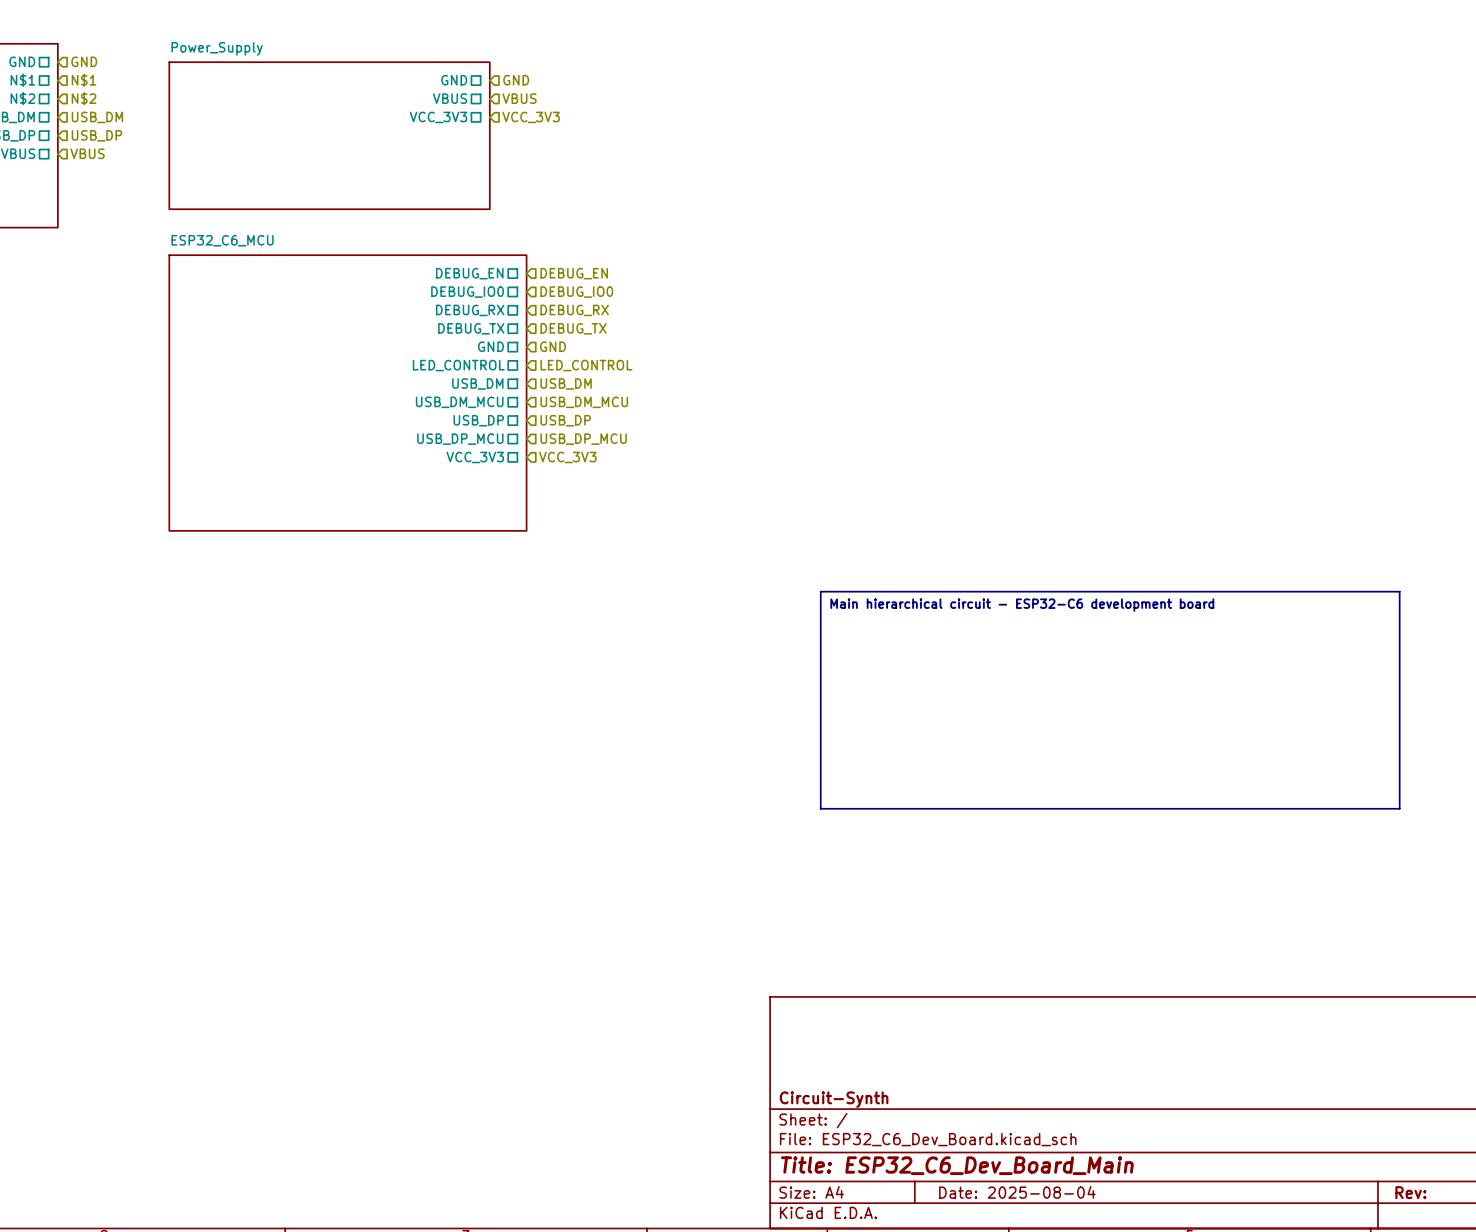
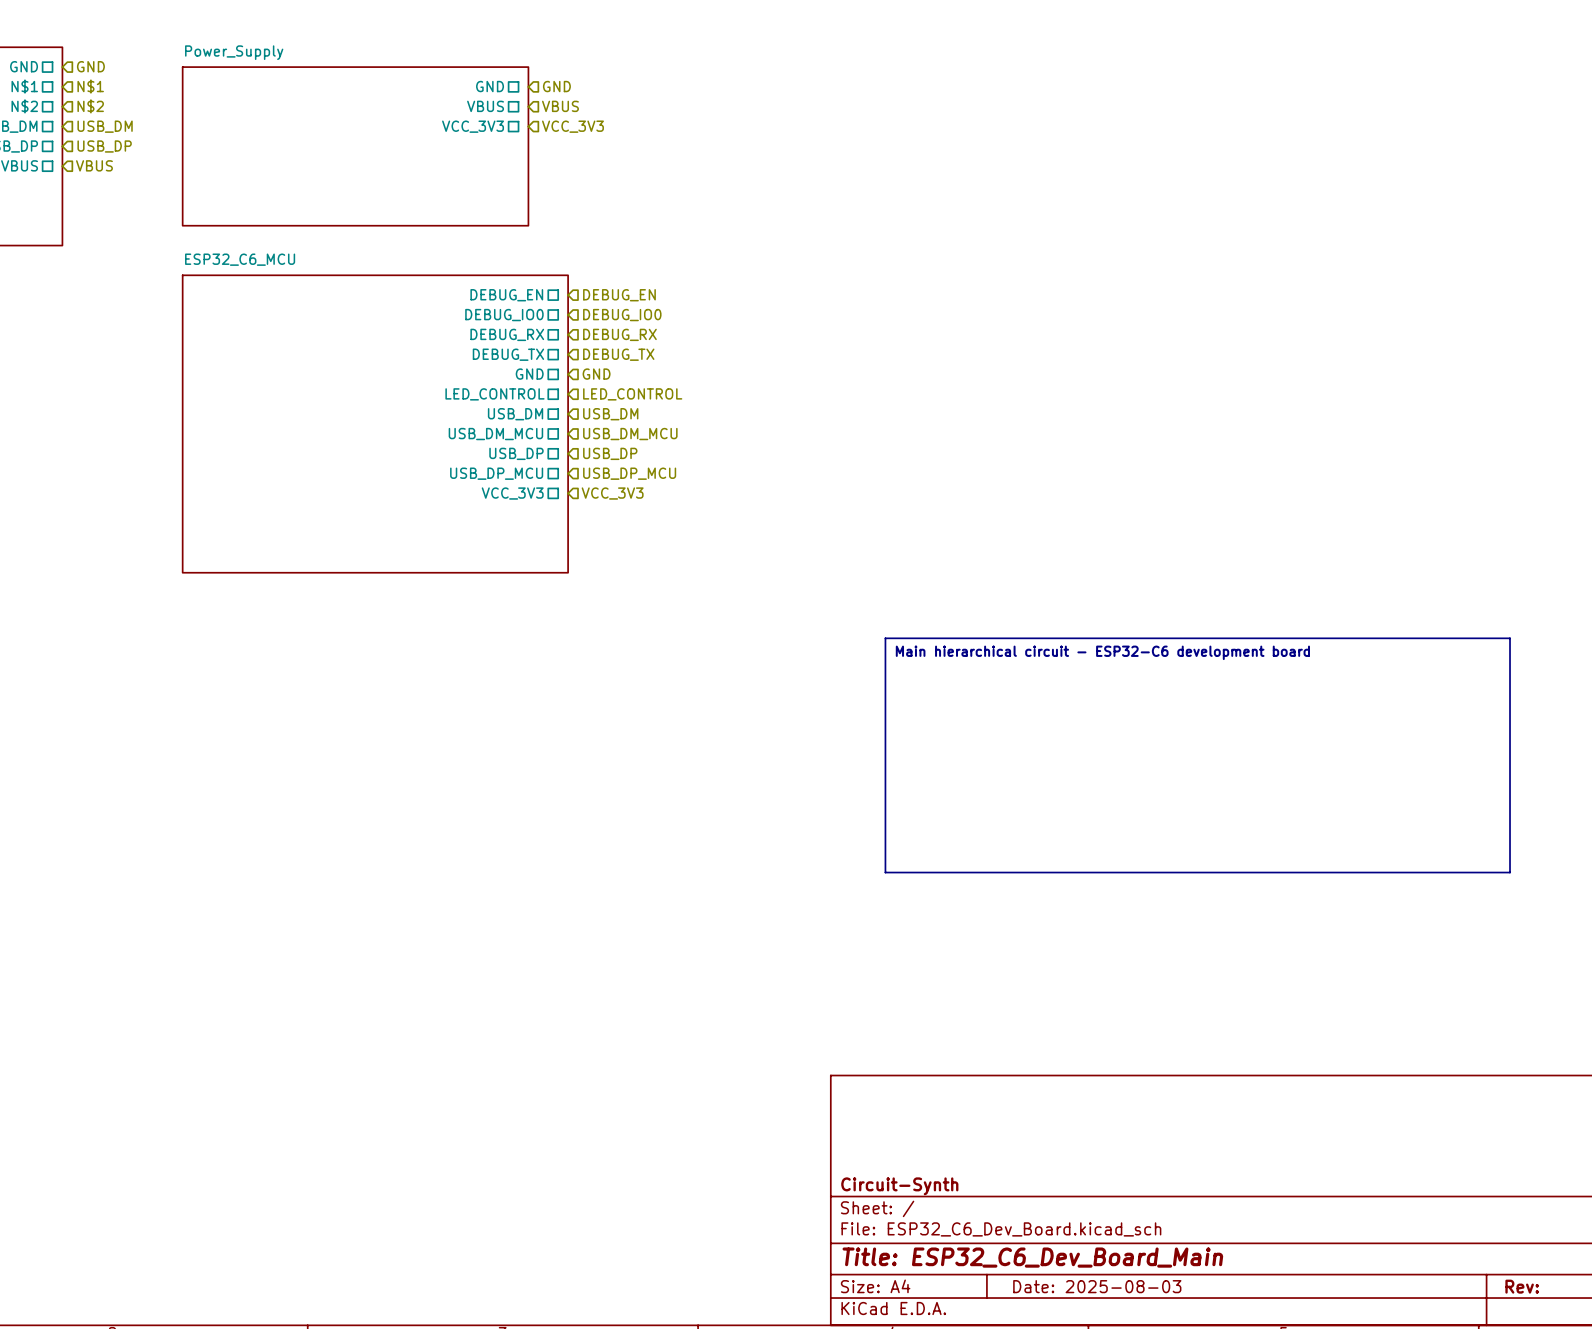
title block: Date: 2025-08-04 (1017, 1192) -> Date: 2025-08-03 (1097, 1286)

